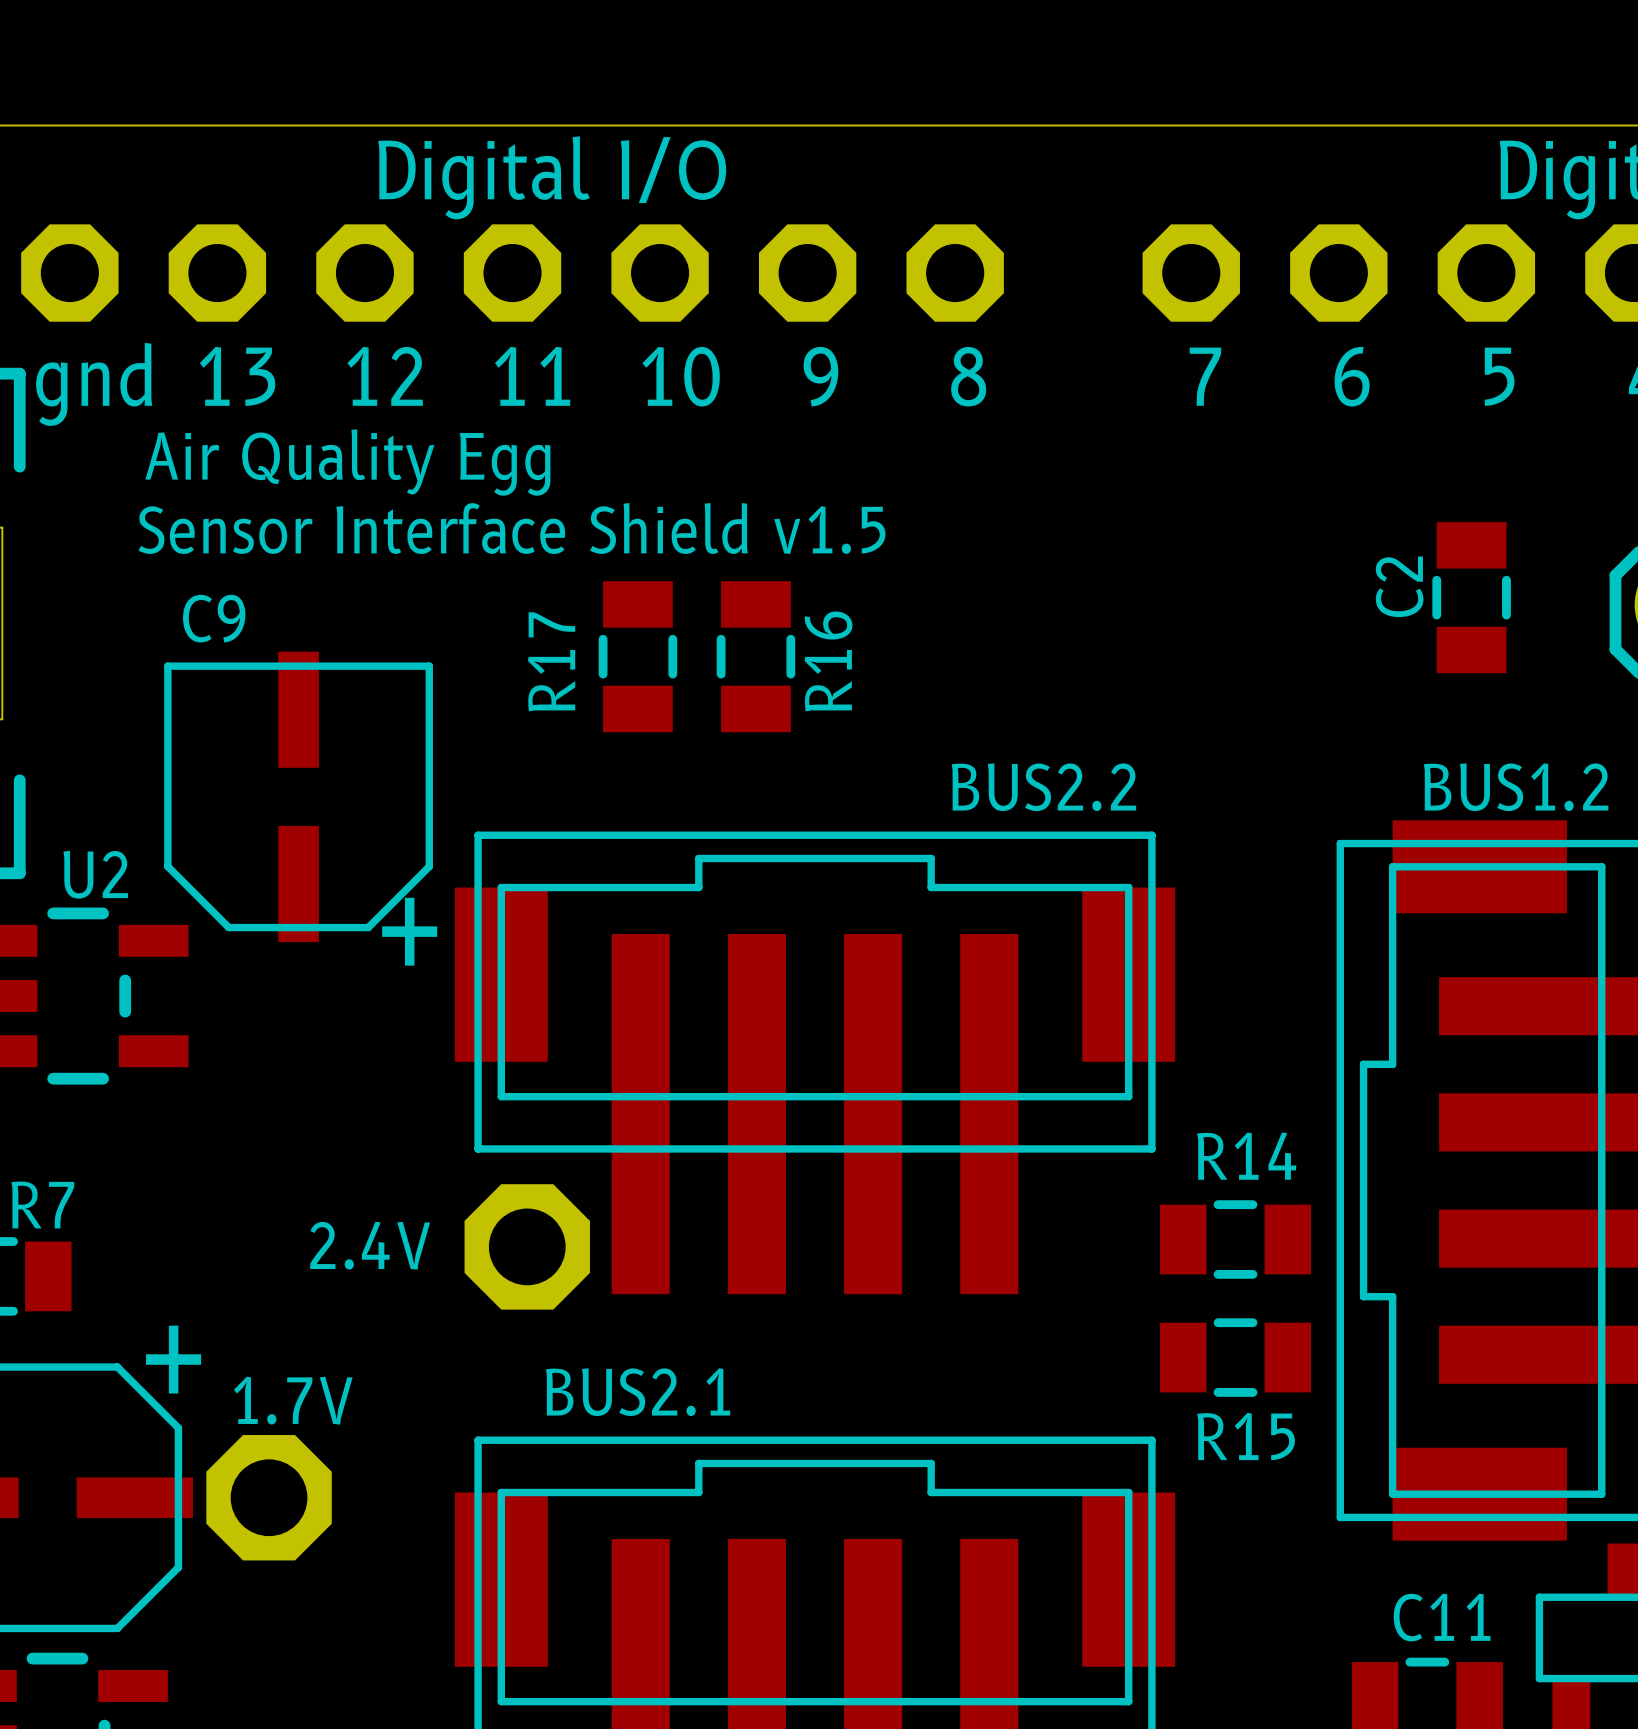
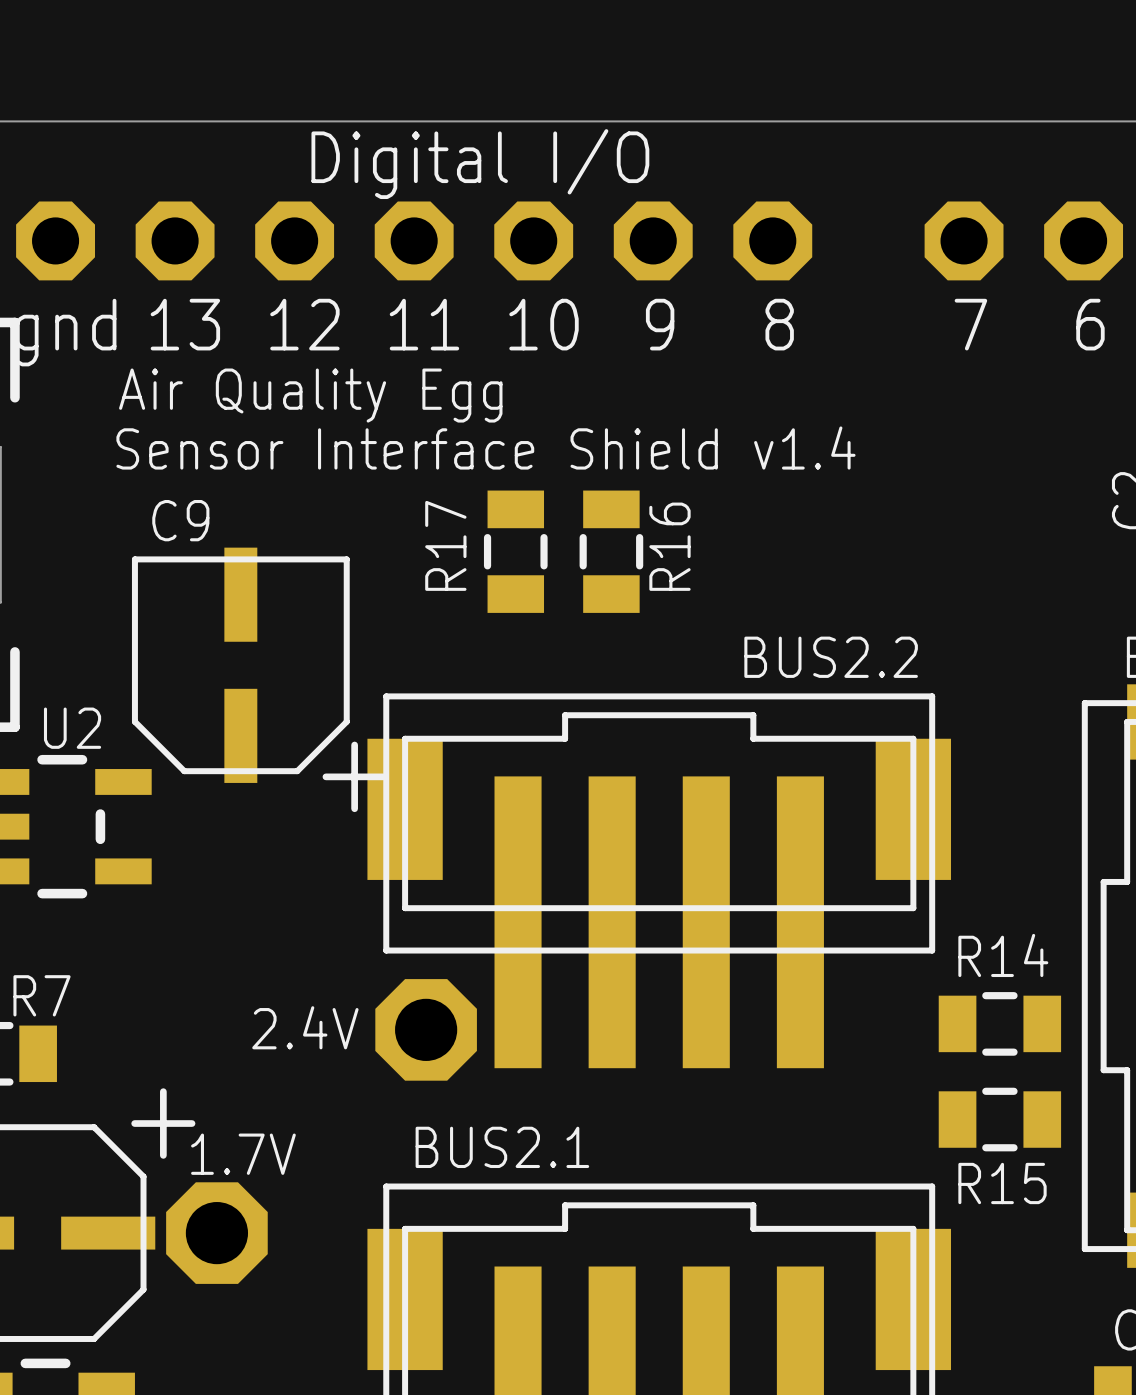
text: Sensor Interface Shield v1.5 (512, 528) -> Sensor Interface Shield v1.4 (485, 448)

